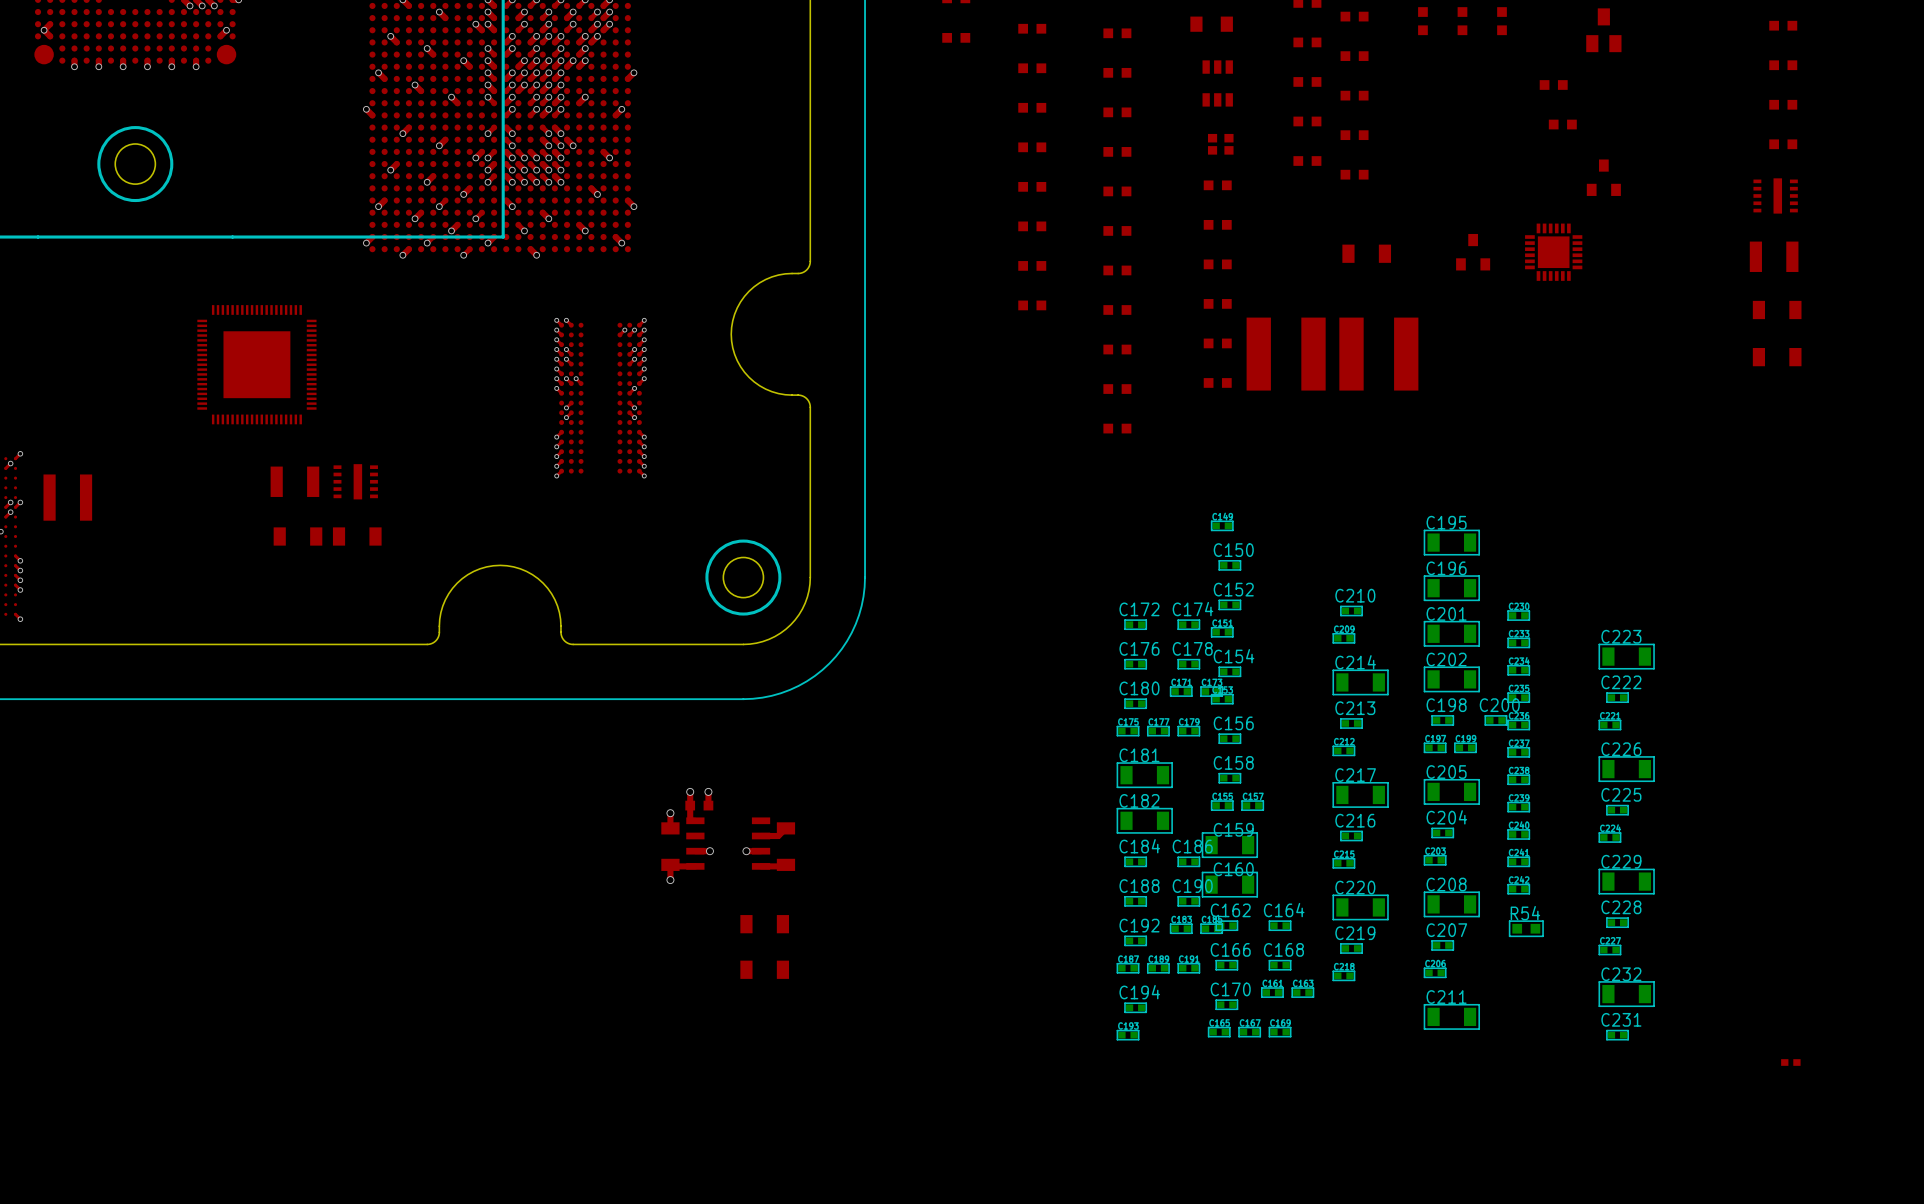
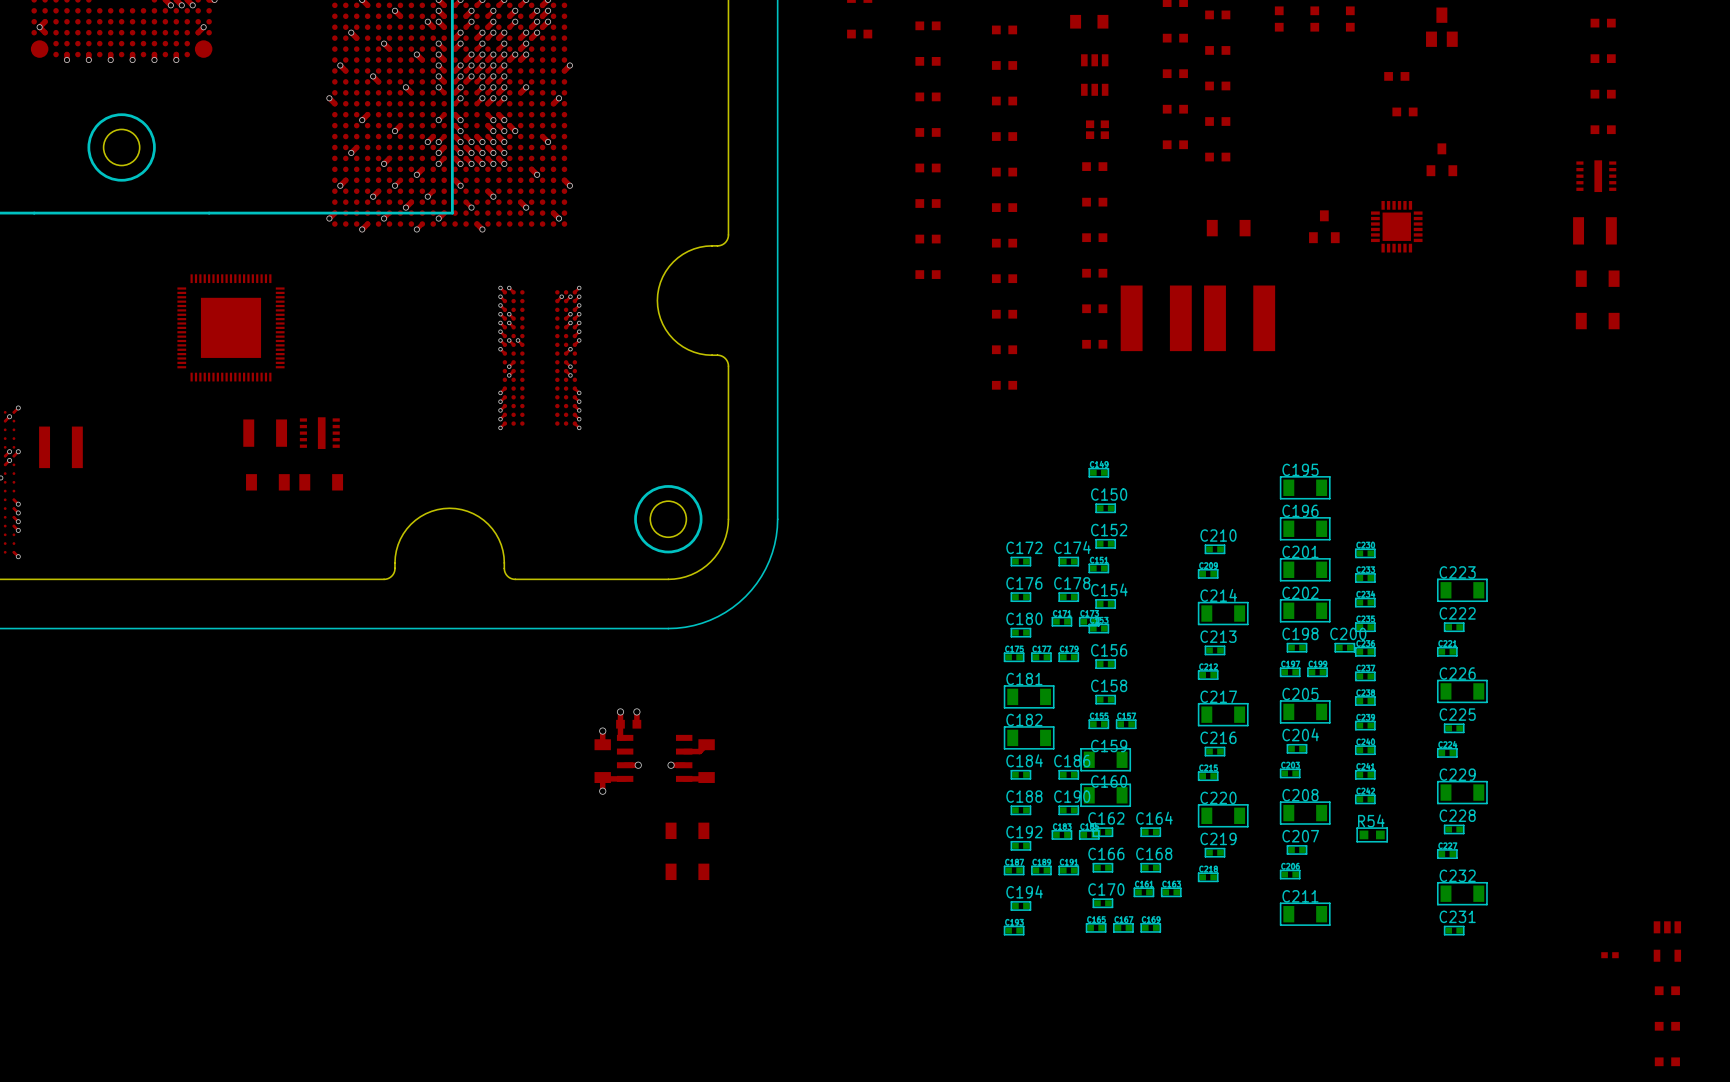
part: none -> (1667, 941)
part: none -> (1667, 990)
part: none -> (1667, 1026)
part: none -> (1667, 1061)

